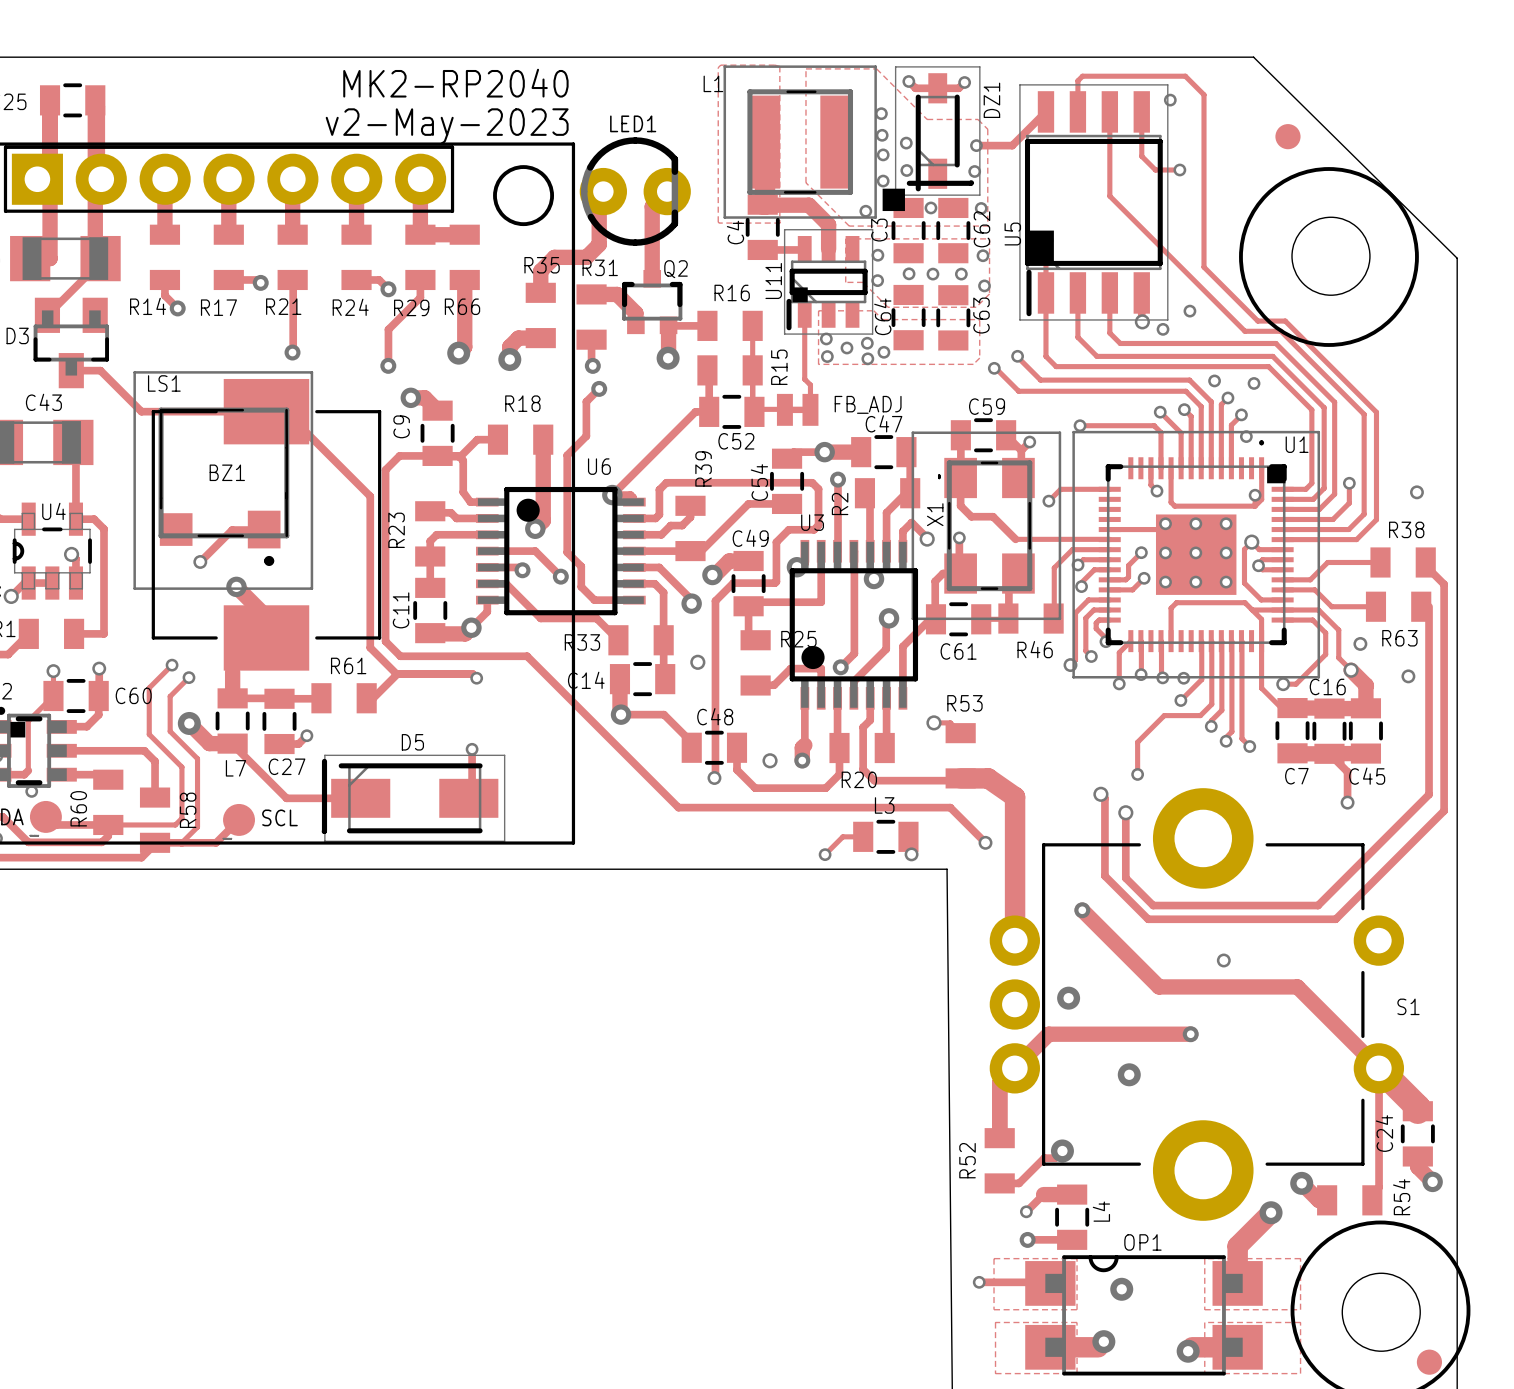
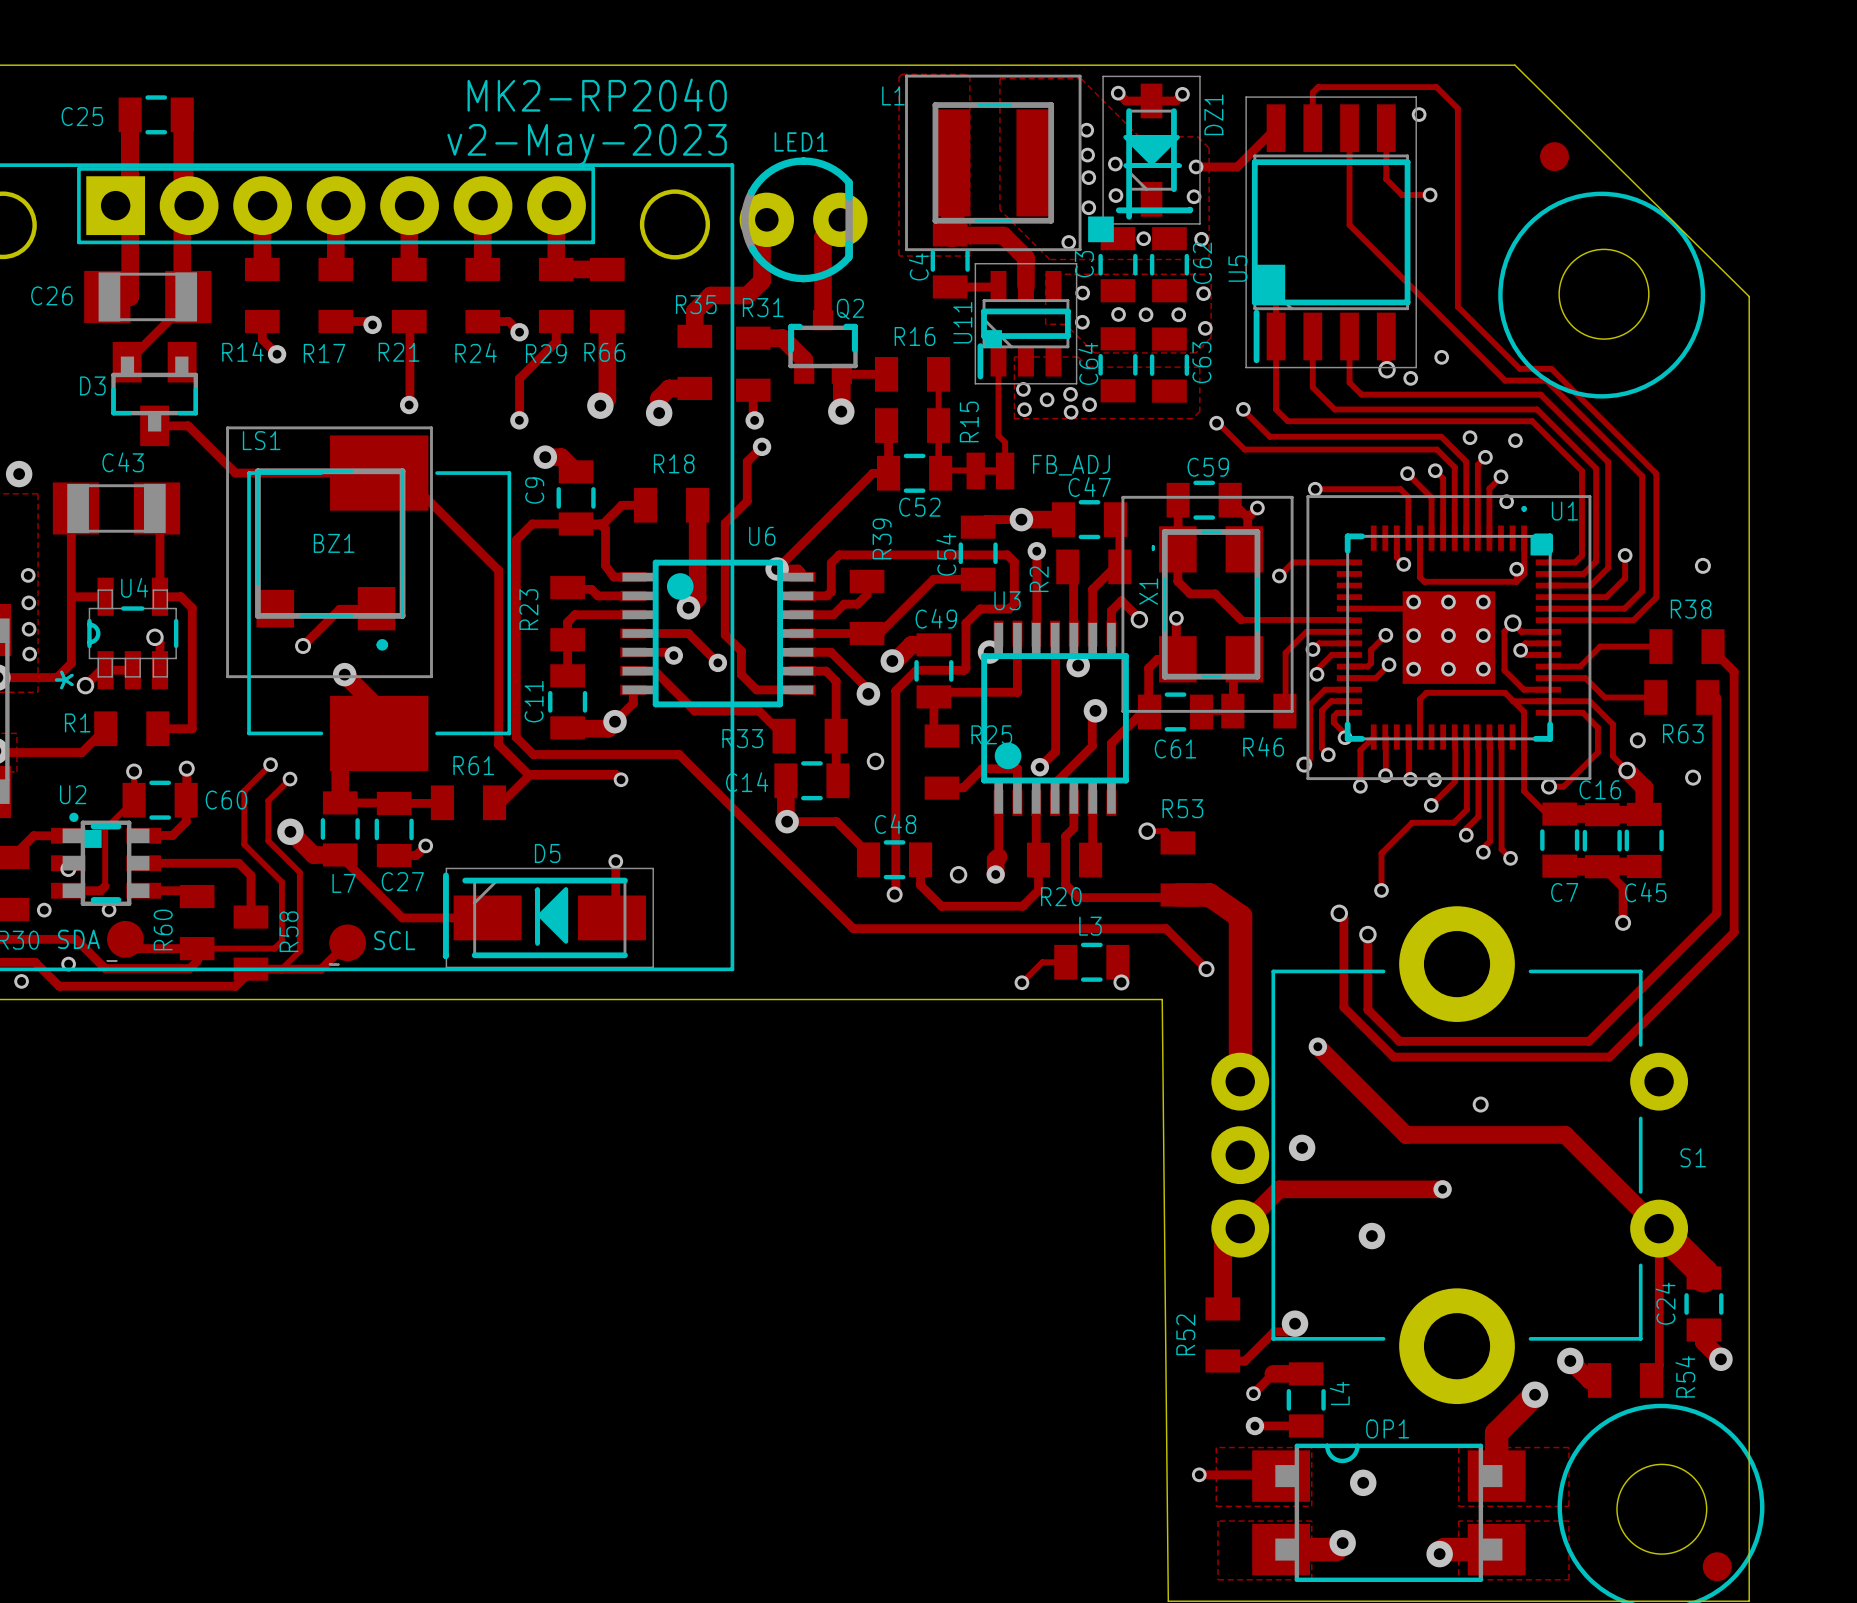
drawing: none -> [1123, 134, 1183, 169]
drawing: none -> [534, 887, 569, 946]

